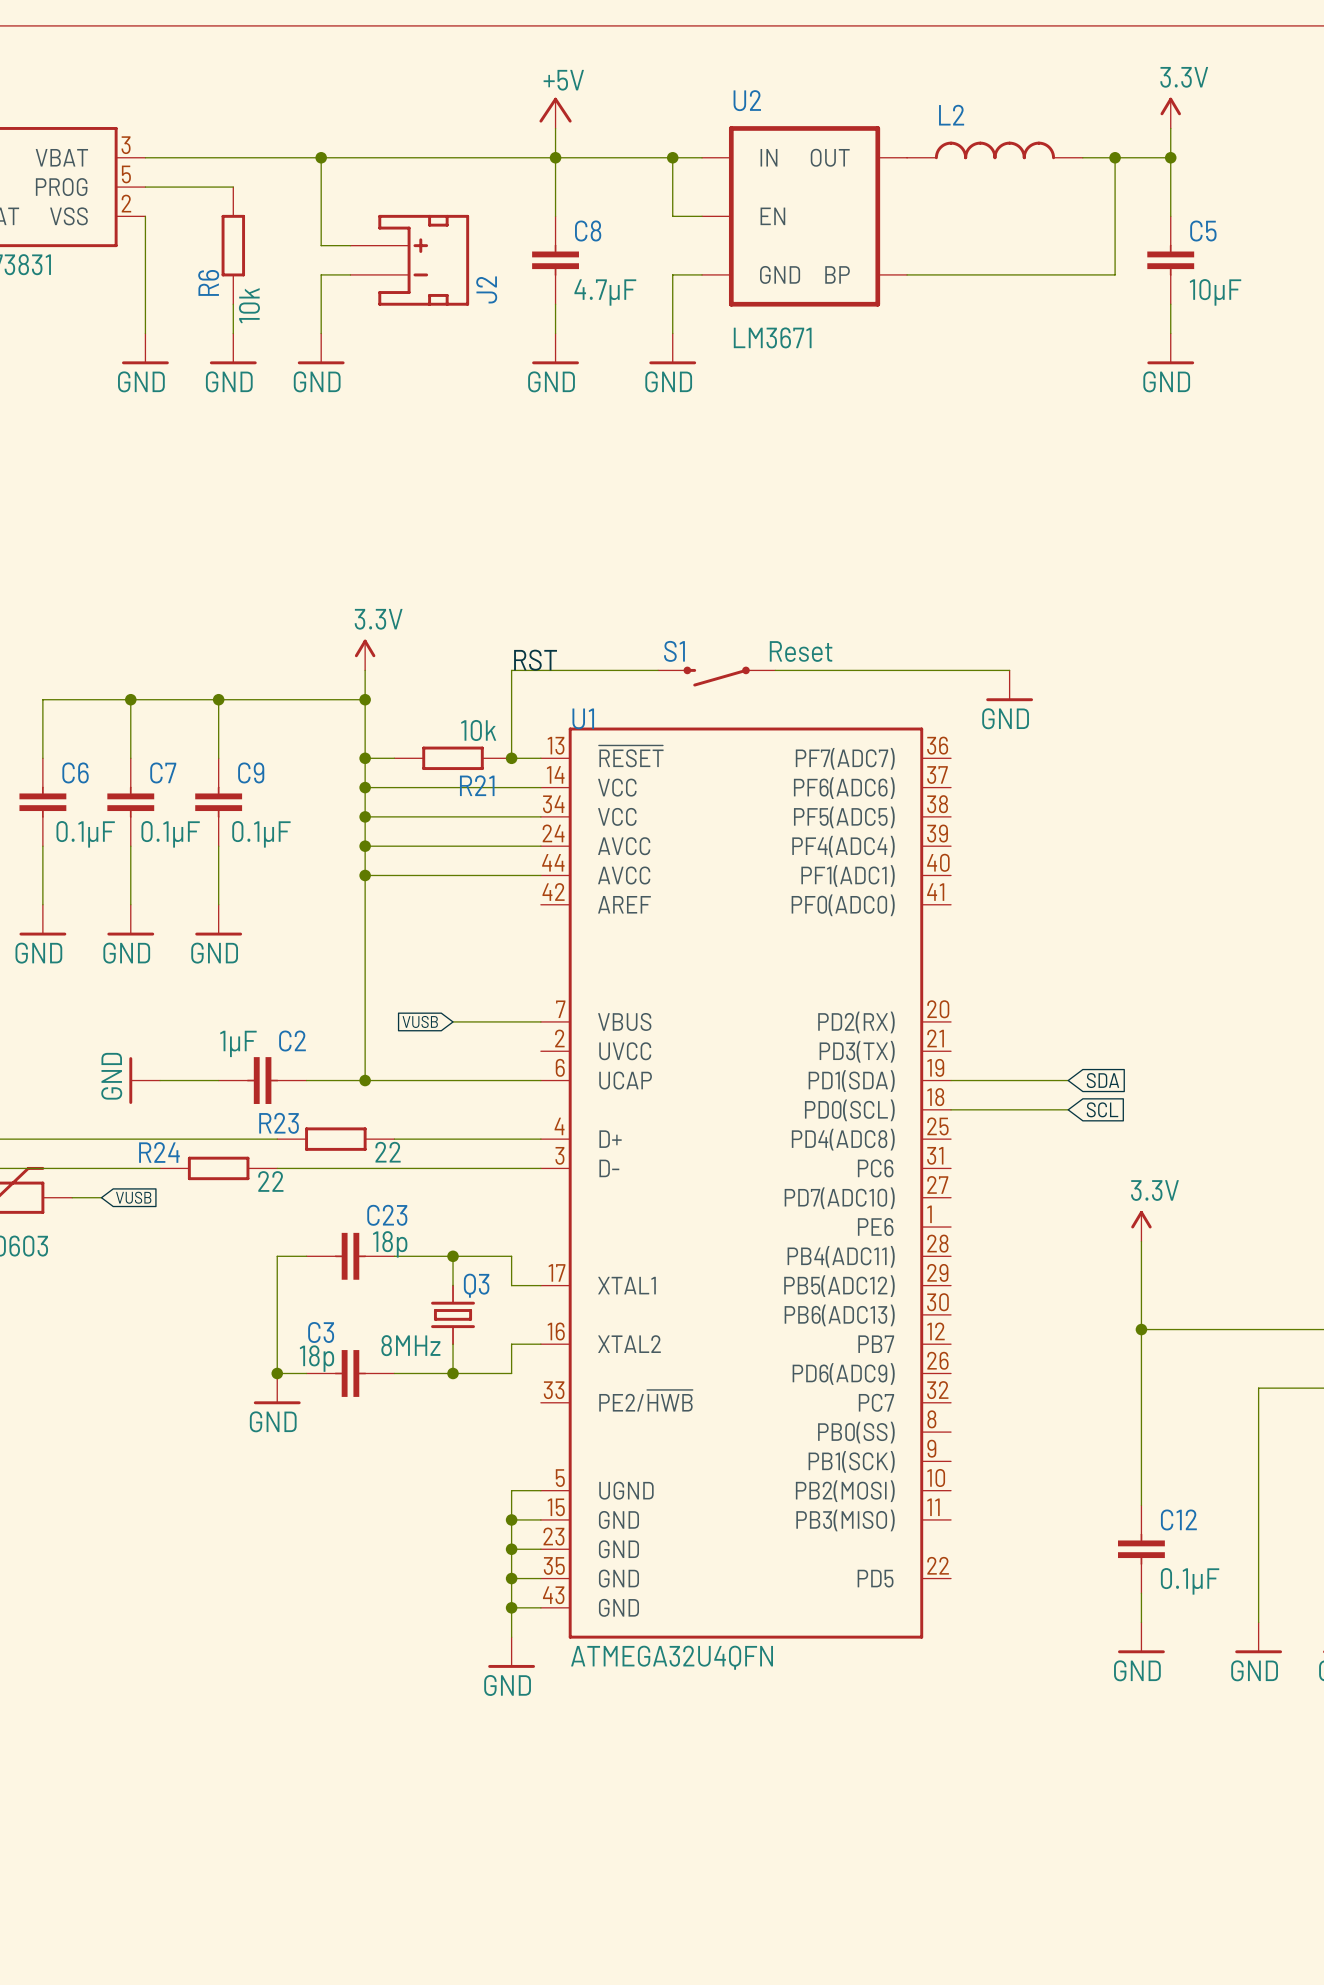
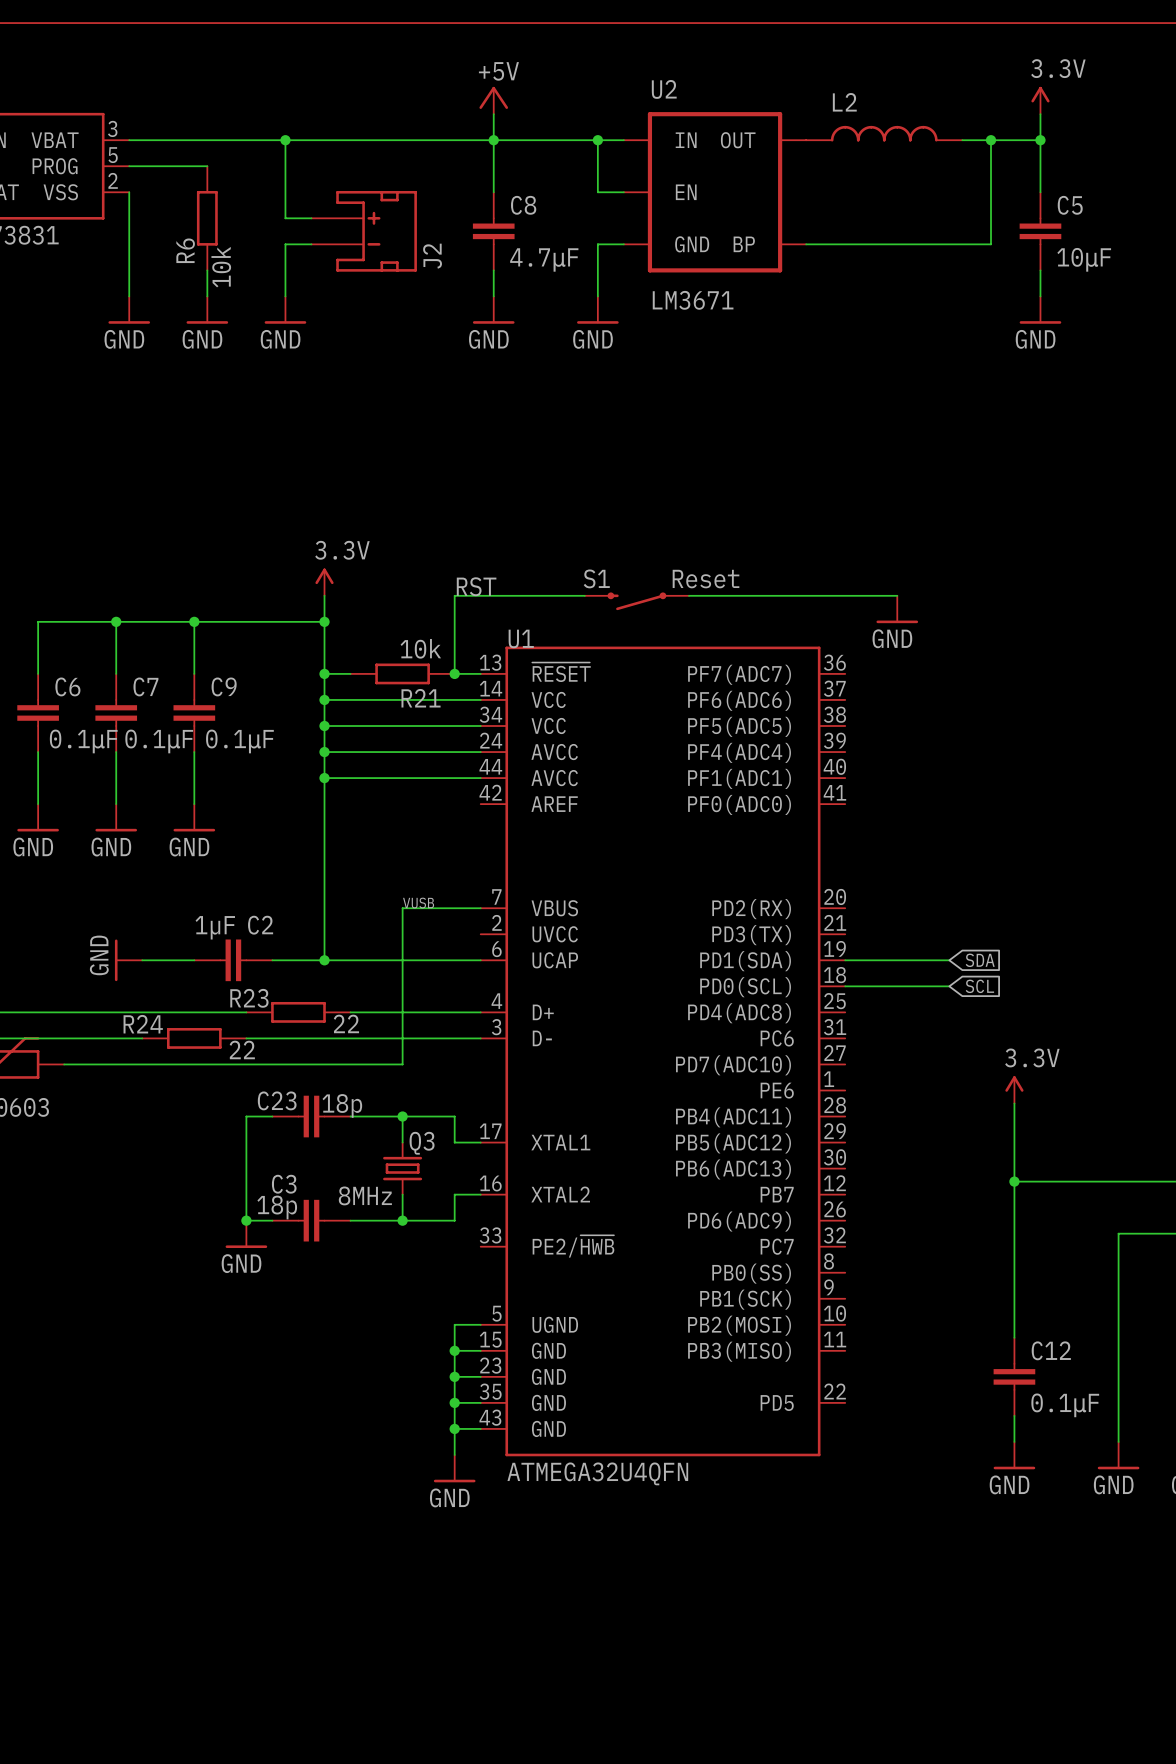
label: none -> VUSB (418, 903)
global label: VUSB (420, 1021) -> none
wire: none -> (402, 908) (402, 1064) (90, 1064)
global label: VUSB (133, 1197) -> none
C23 name position: C23 (387, 1215) -> C23 (277, 1100)

